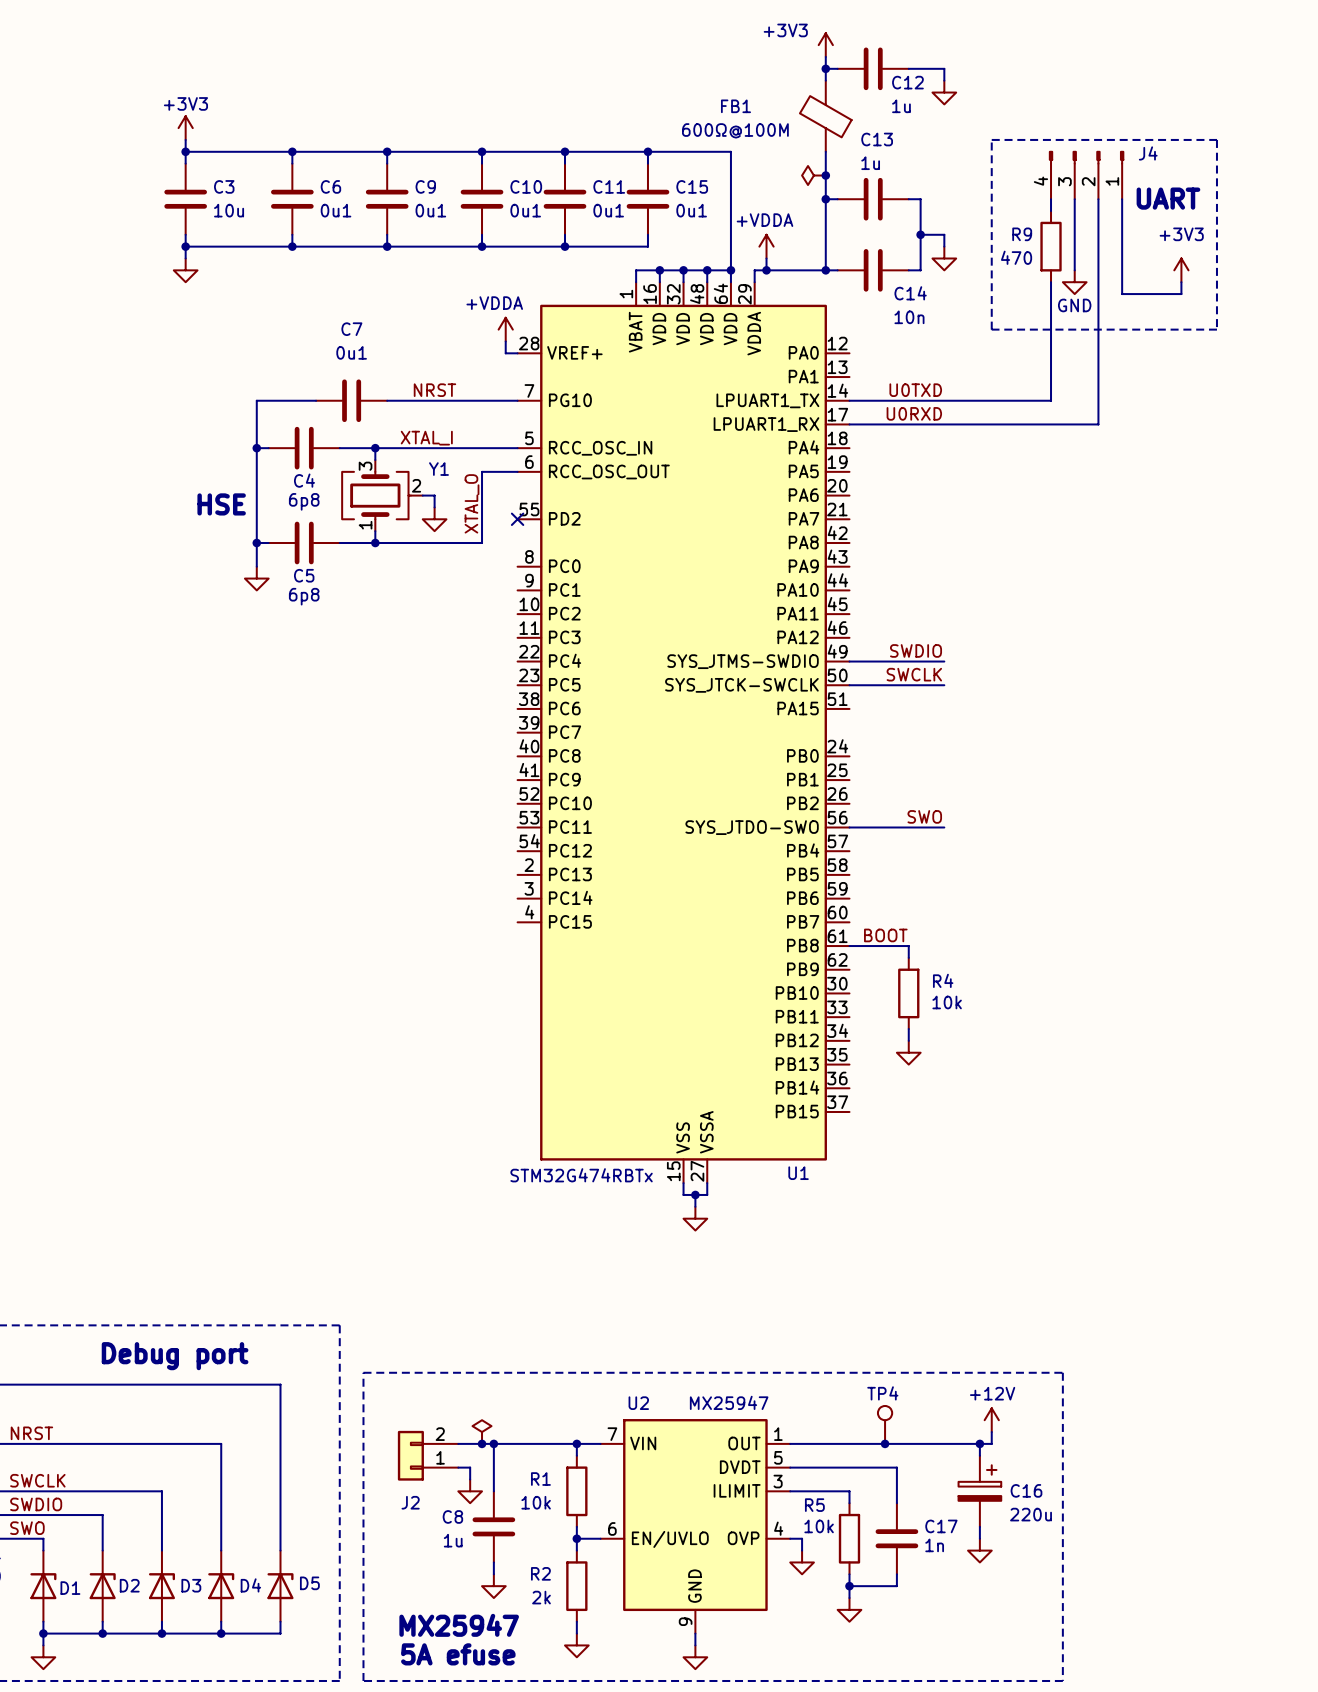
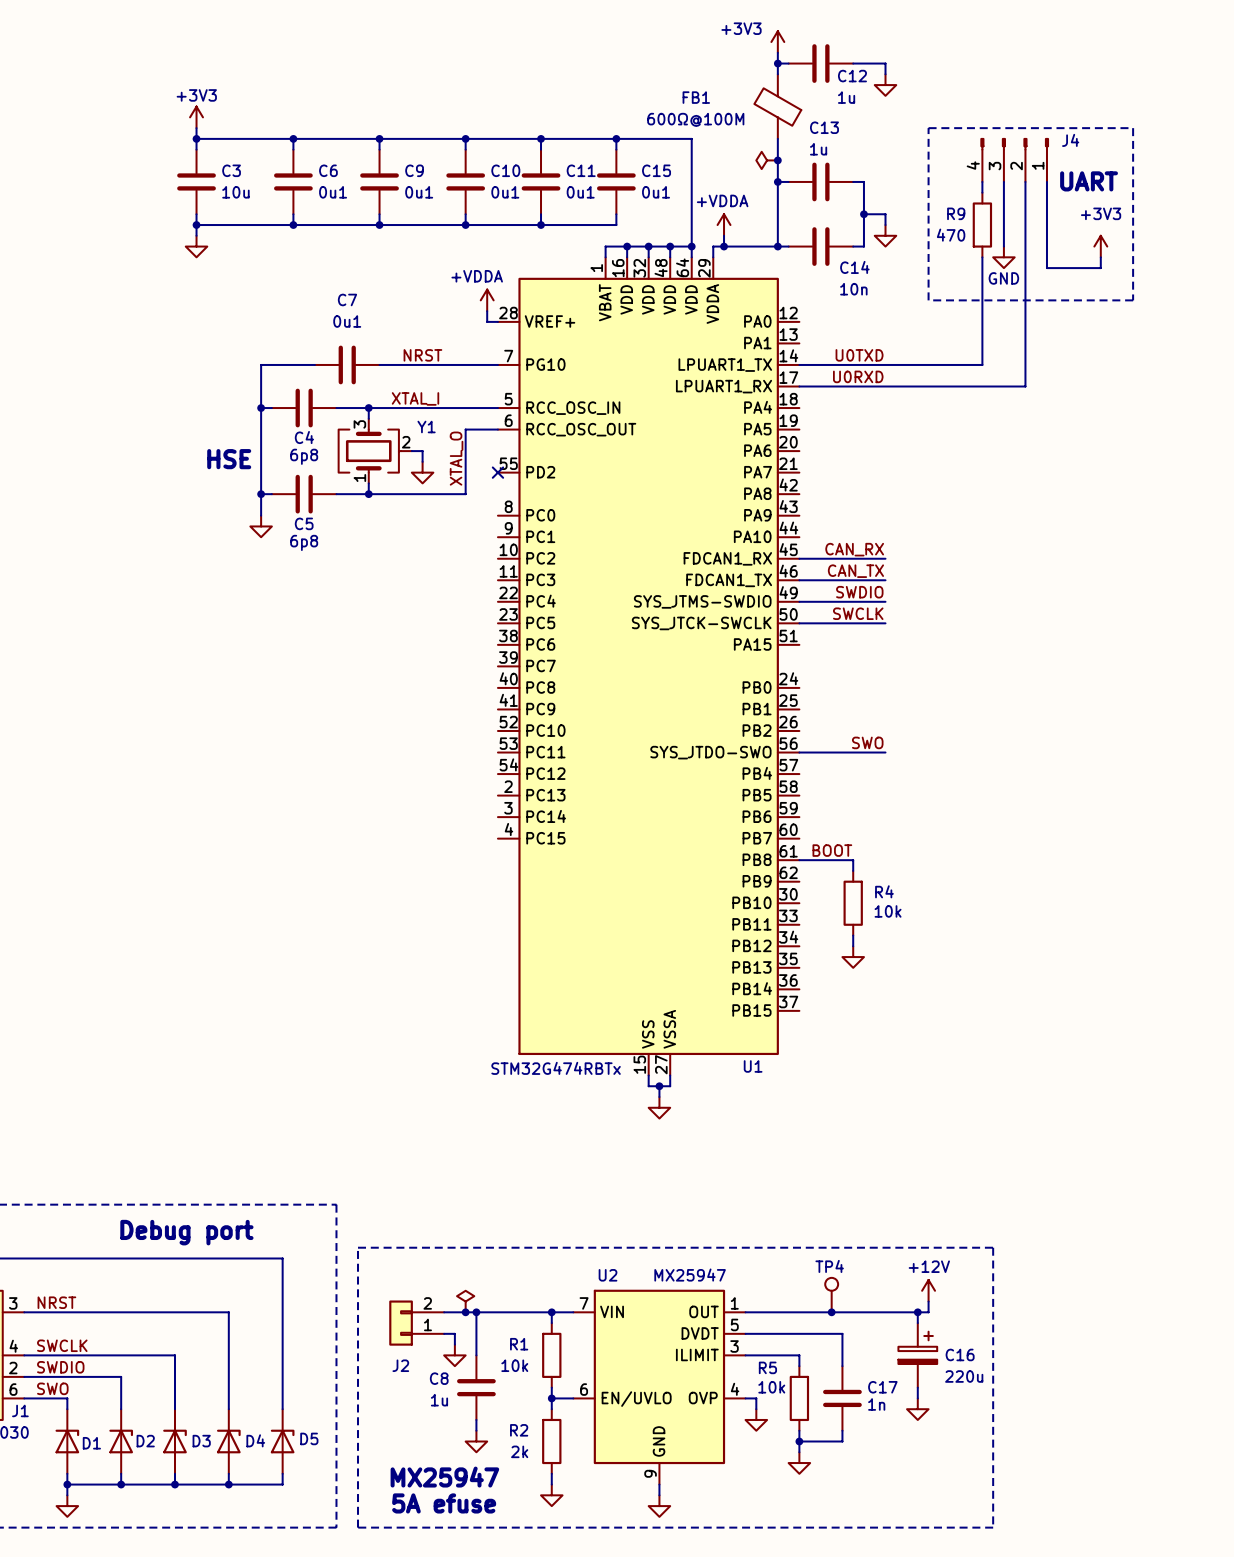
label: none -> CAN_RX (854, 549)
U1 pin name: PA11 (798, 613) -> FDCAN1_RX (727, 558)
wire: none -> (799, 558) (885, 558)
label: none -> CAN_TX (855, 571)
U1 pin name: PA12 (798, 637) -> FDCAN1_TX (729, 580)
wire: none -> (799, 580) (885, 580)

